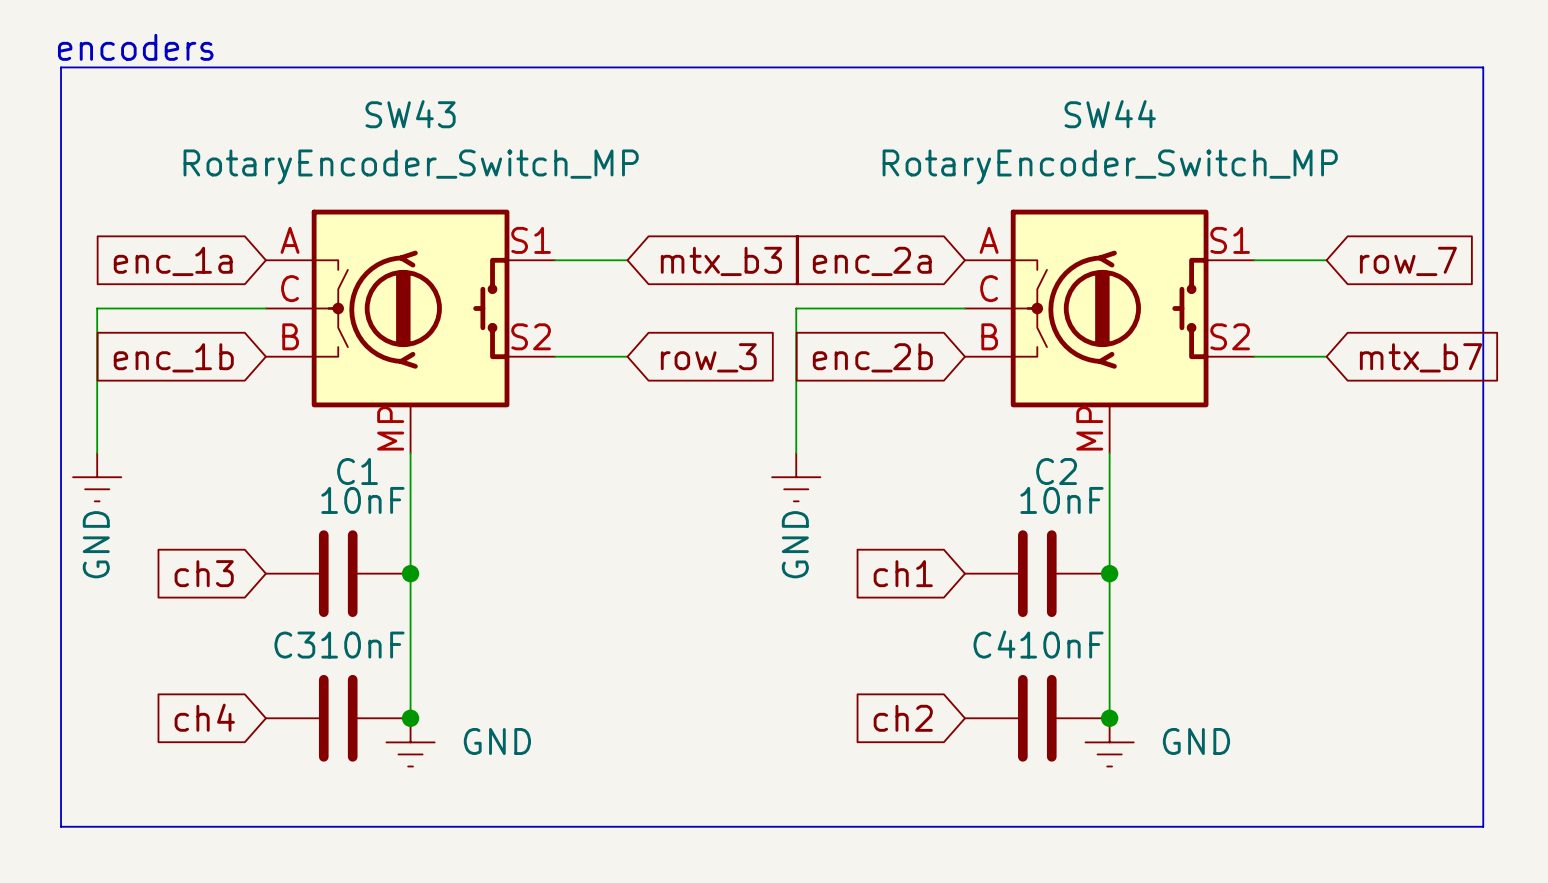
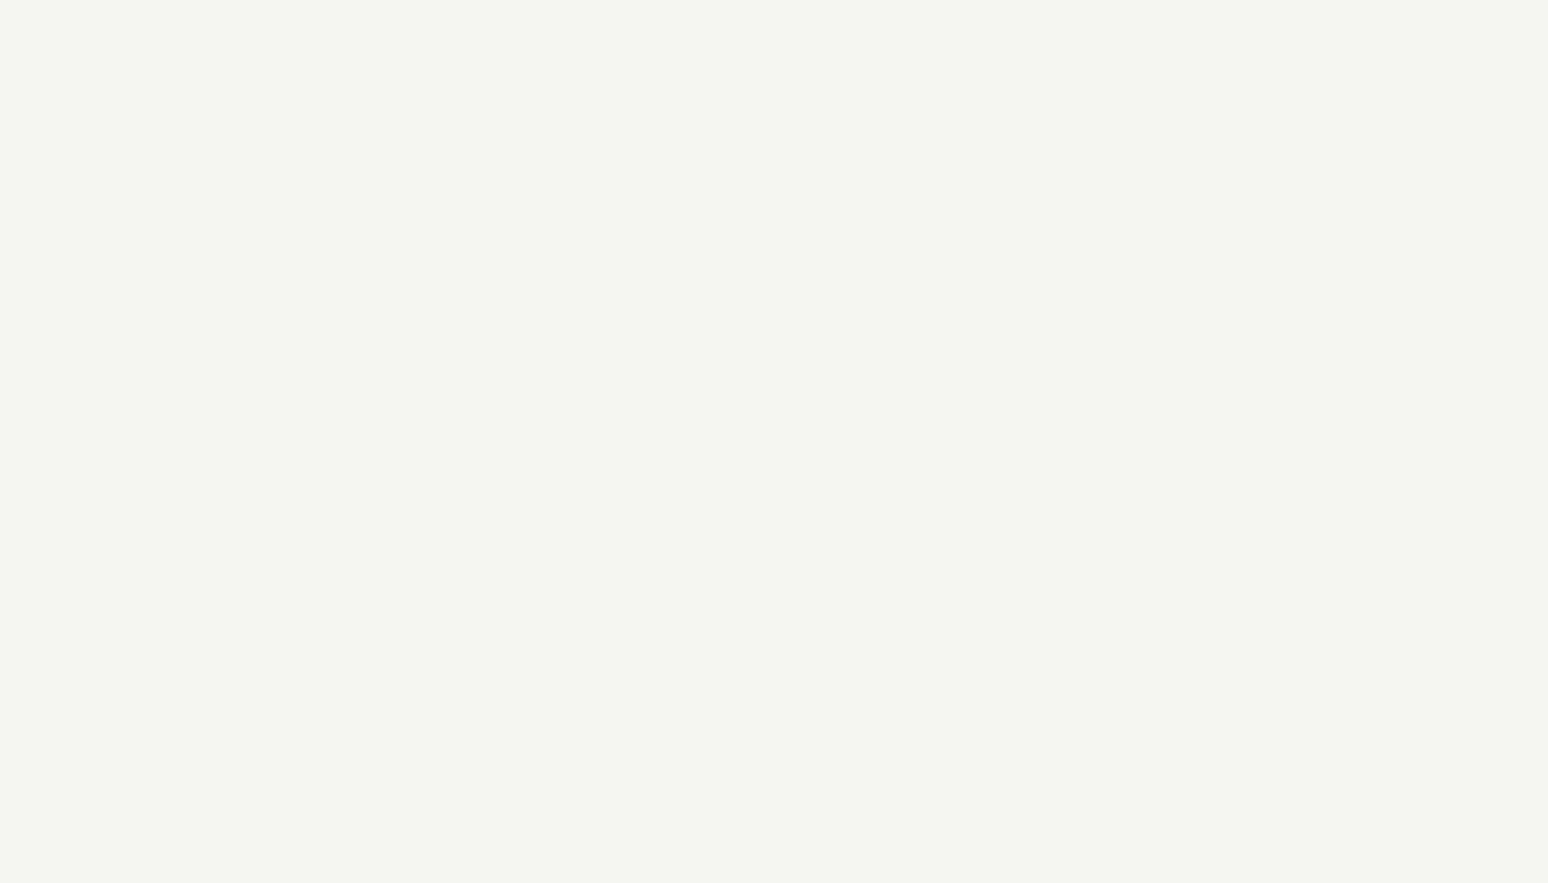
text: encoders (135, 47) -> none
line: (61, 67) (1483, 67) (1483, 826) (61, 826) (61, 67) -> none
wire: (555, 260) (627, 260) -> none
wire: (1254, 260) (1326, 260) -> none
global label: enc_1a (173, 261) -> none
global label: mtx_b3 (721, 261) -> none
global label: enc_2a (872, 261) -> none
global label: row_7 (1408, 261) -> none
wire: (265, 308) (97, 308) (97, 453) -> none
wire: (964, 308) (796, 308) (796, 453) -> none
SW43: RotaryEncoder_Switch_MP (410, 331) -> none
SW44: RotaryEncoder_Switch_MP (1109, 331) -> none
wire: (555, 356) (627, 356) -> none
wire: (1254, 356) (1326, 356) -> none
global label: enc_1b (173, 357) -> none
global label: row_3 (708, 357) -> none
global label: enc_2b (872, 357) -> none
global label: mtx_b7 (1421, 357) -> none
wire: (410, 453) (410, 718) -> none
wire: (1109, 453) (1109, 718) -> none
power symbol: GND (97, 477) -> none
power symbol: GND (796, 477) -> none
global label: ch3 (204, 573) -> none
C1: 10nF (338, 573) -> none
junction: (410, 573) -> none
global label: ch1 (903, 573) -> none
C2: 10nF (1037, 573) -> none
junction: (1109, 573) -> none
global label: ch4 (204, 717) -> none
C3: 10nF (338, 718) -> none
junction: (410, 718) -> none
global label: ch2 (903, 718) -> none
C4: 10nF (1037, 718) -> none
junction: (1109, 718) -> none
power symbol: GND (410, 742) -> none
power symbol: GND (1109, 742) -> none

